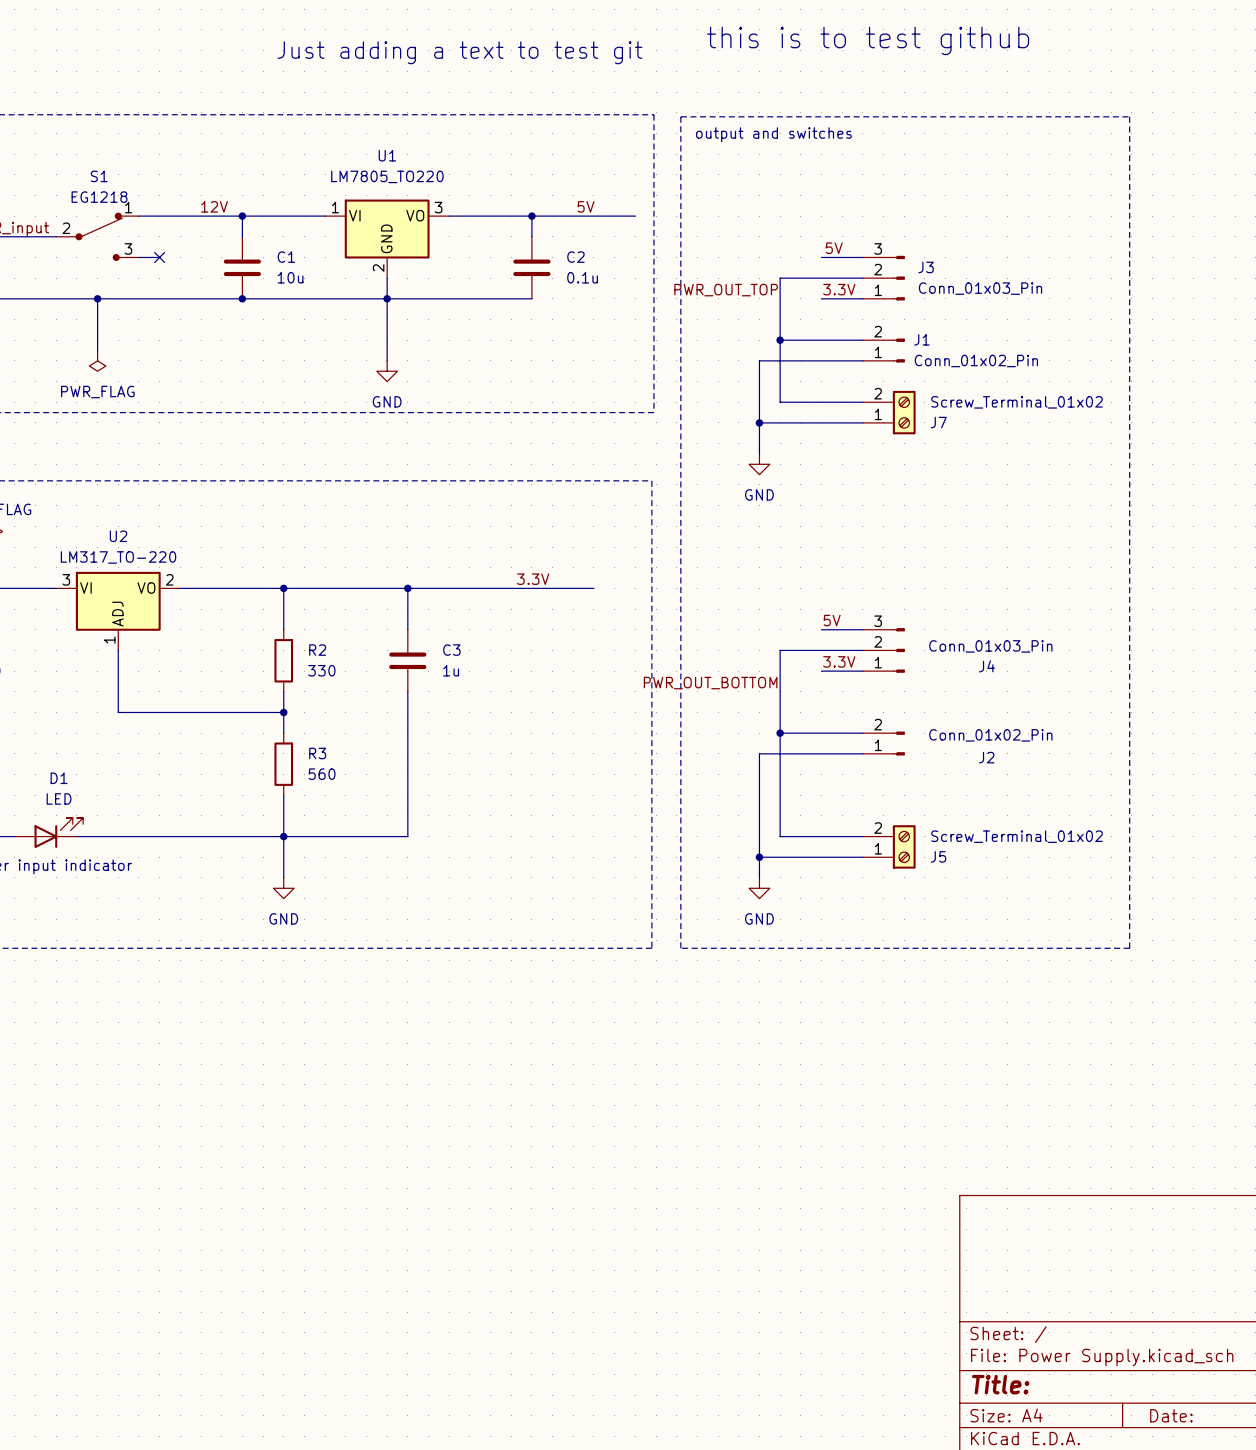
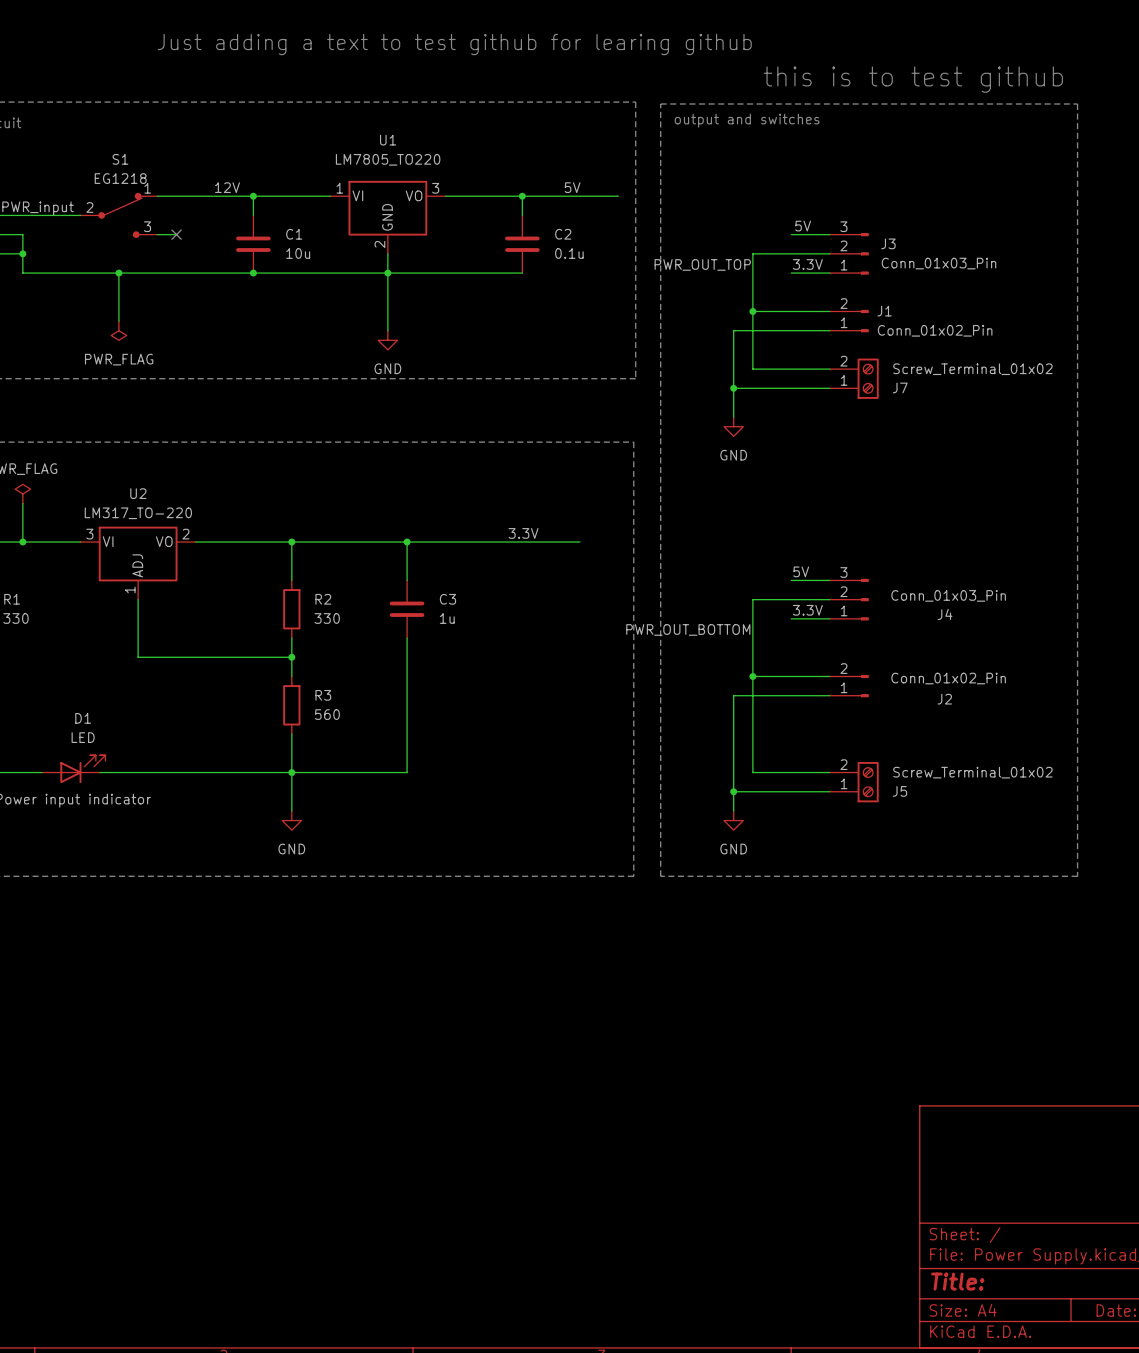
text position: this is to test github (868, 40) -> this is to test github (913, 79)
text: Just adding a text to test git (459, 52) -> Just adding a text to test github for learing github (454, 44)

